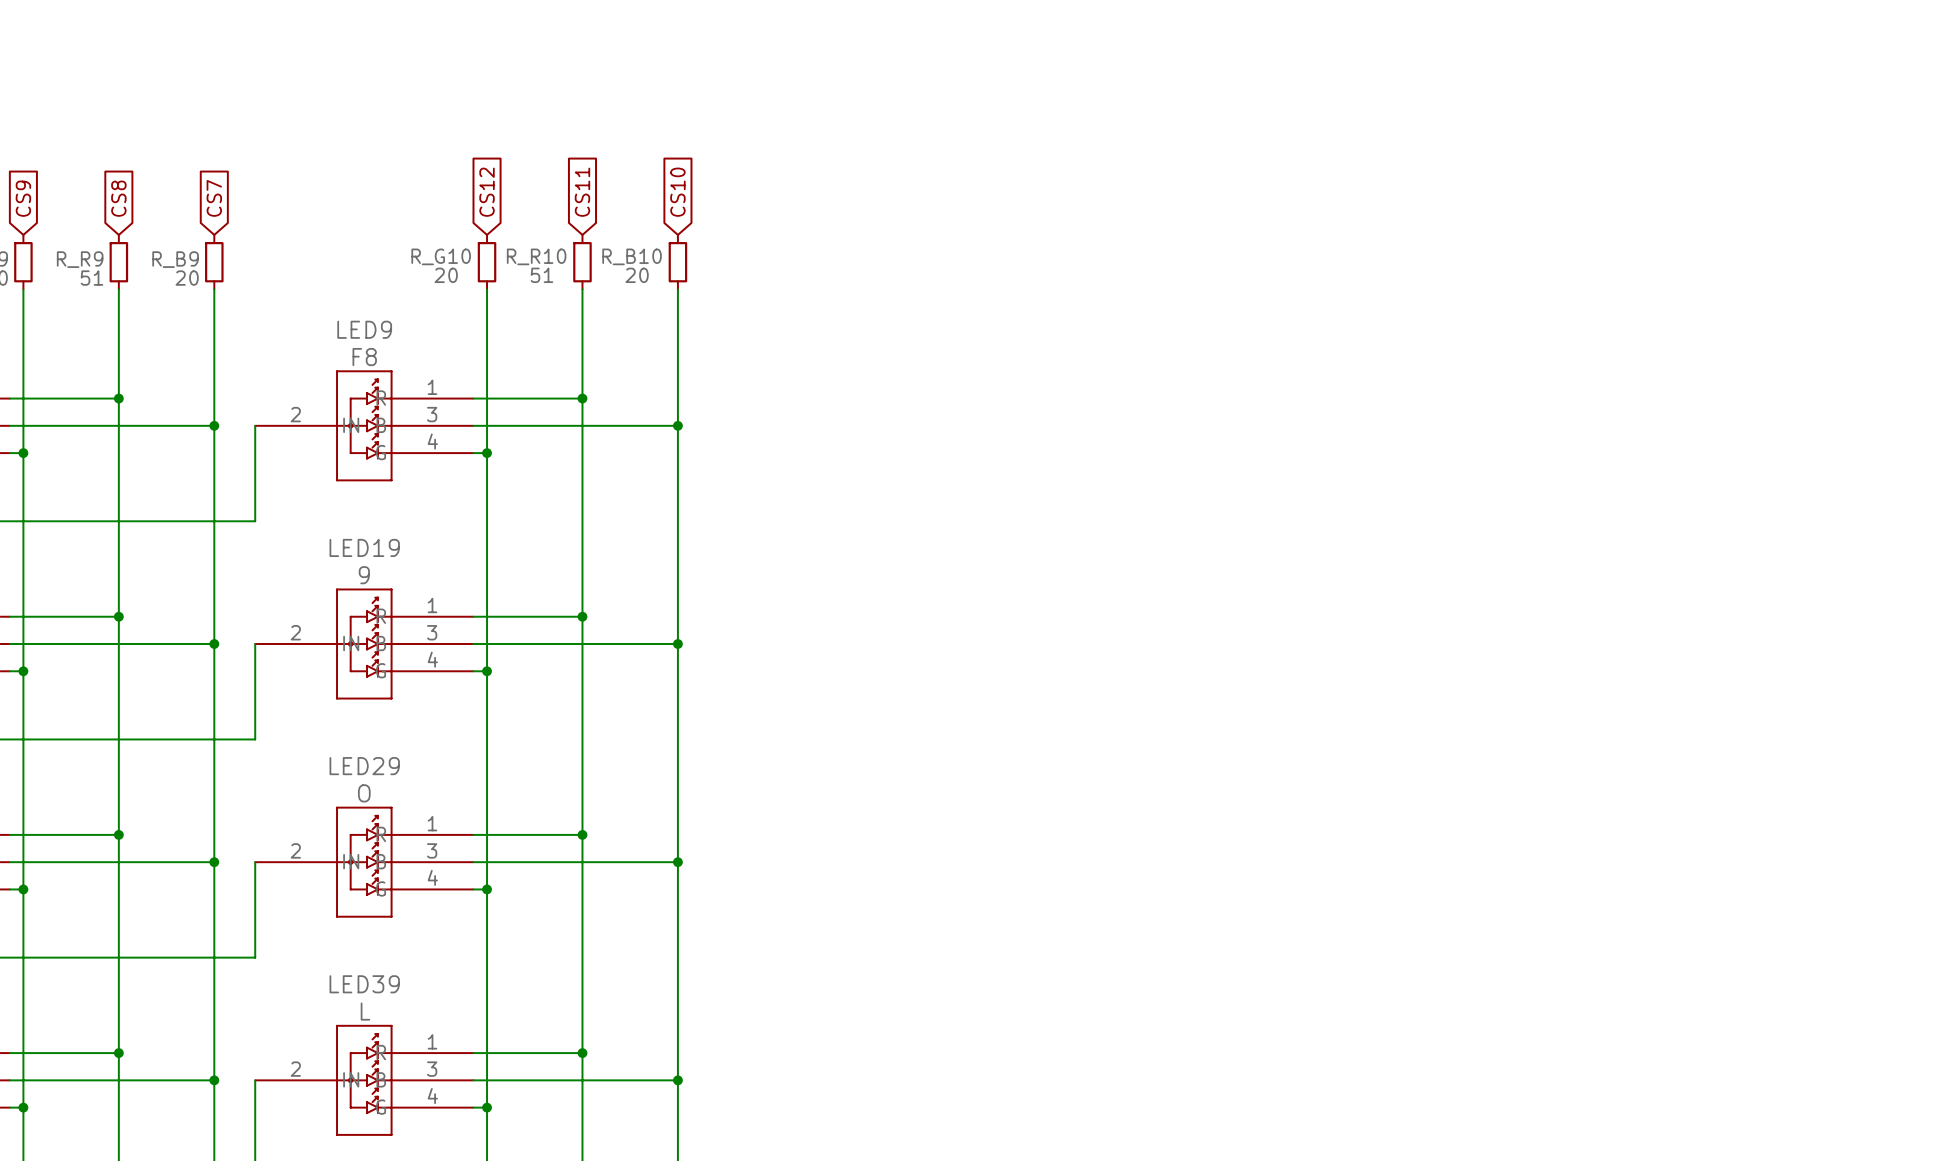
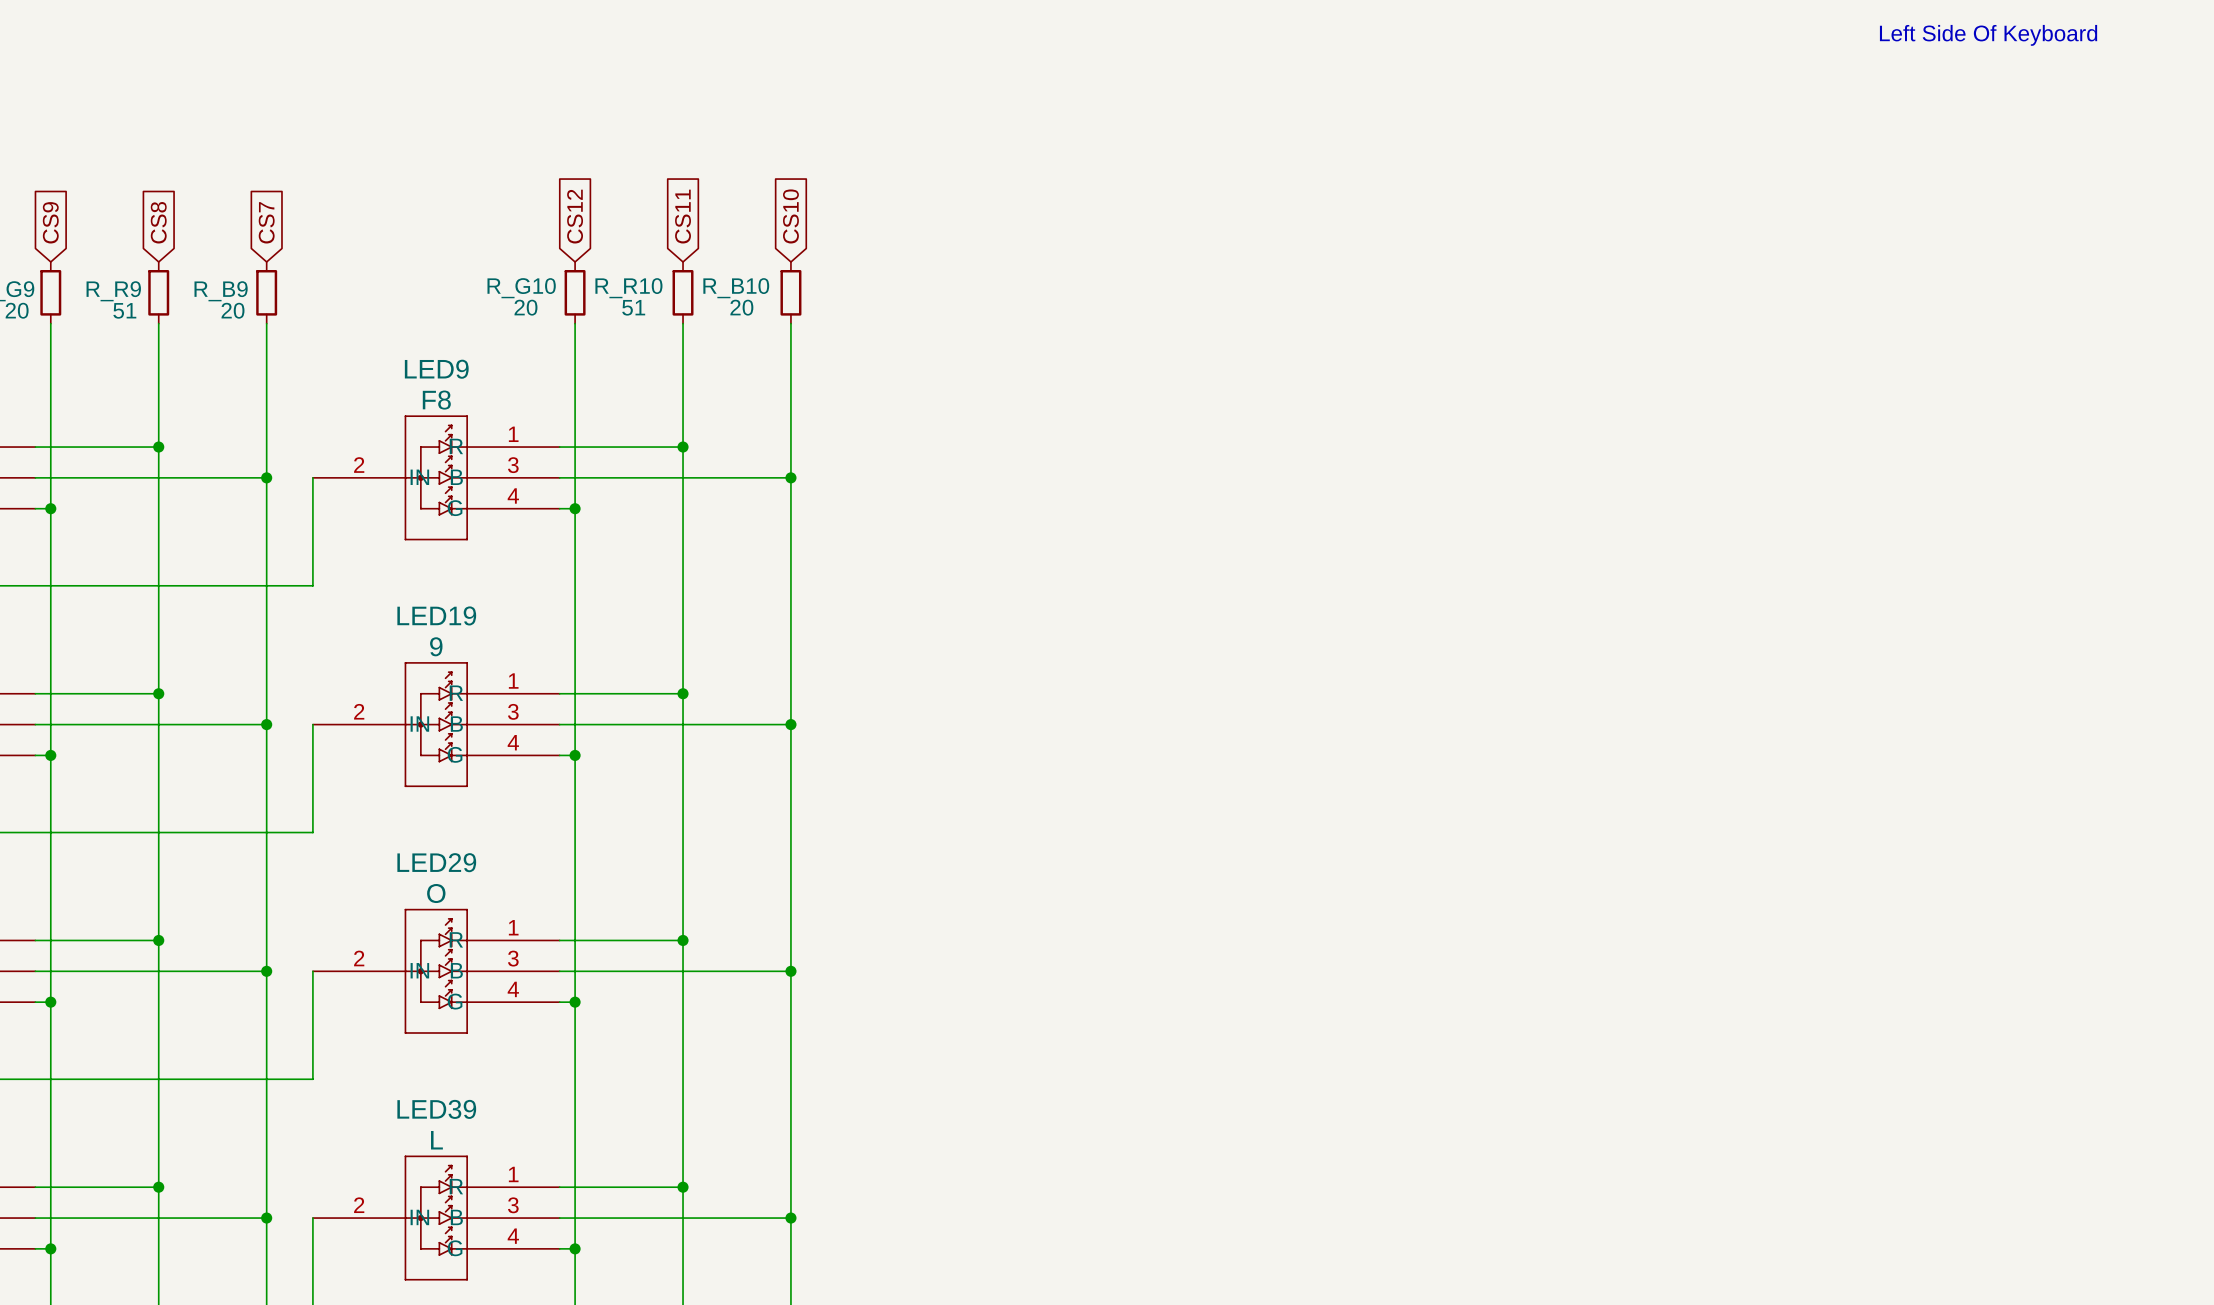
text: none -> Left Side Of Keyboard (1988, 35)

